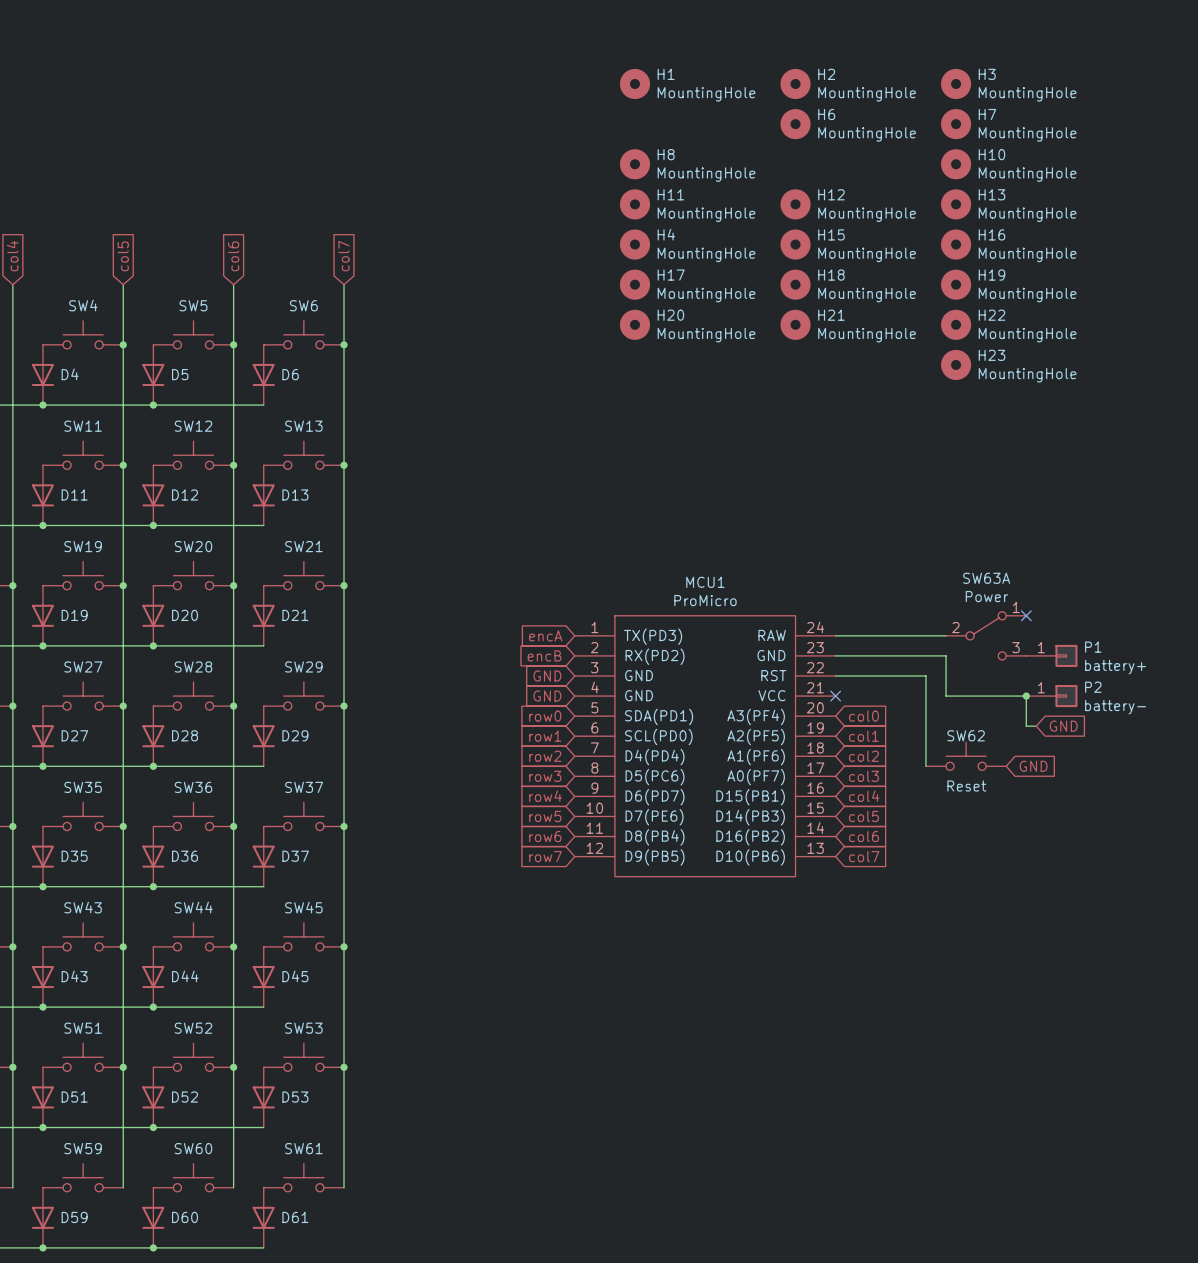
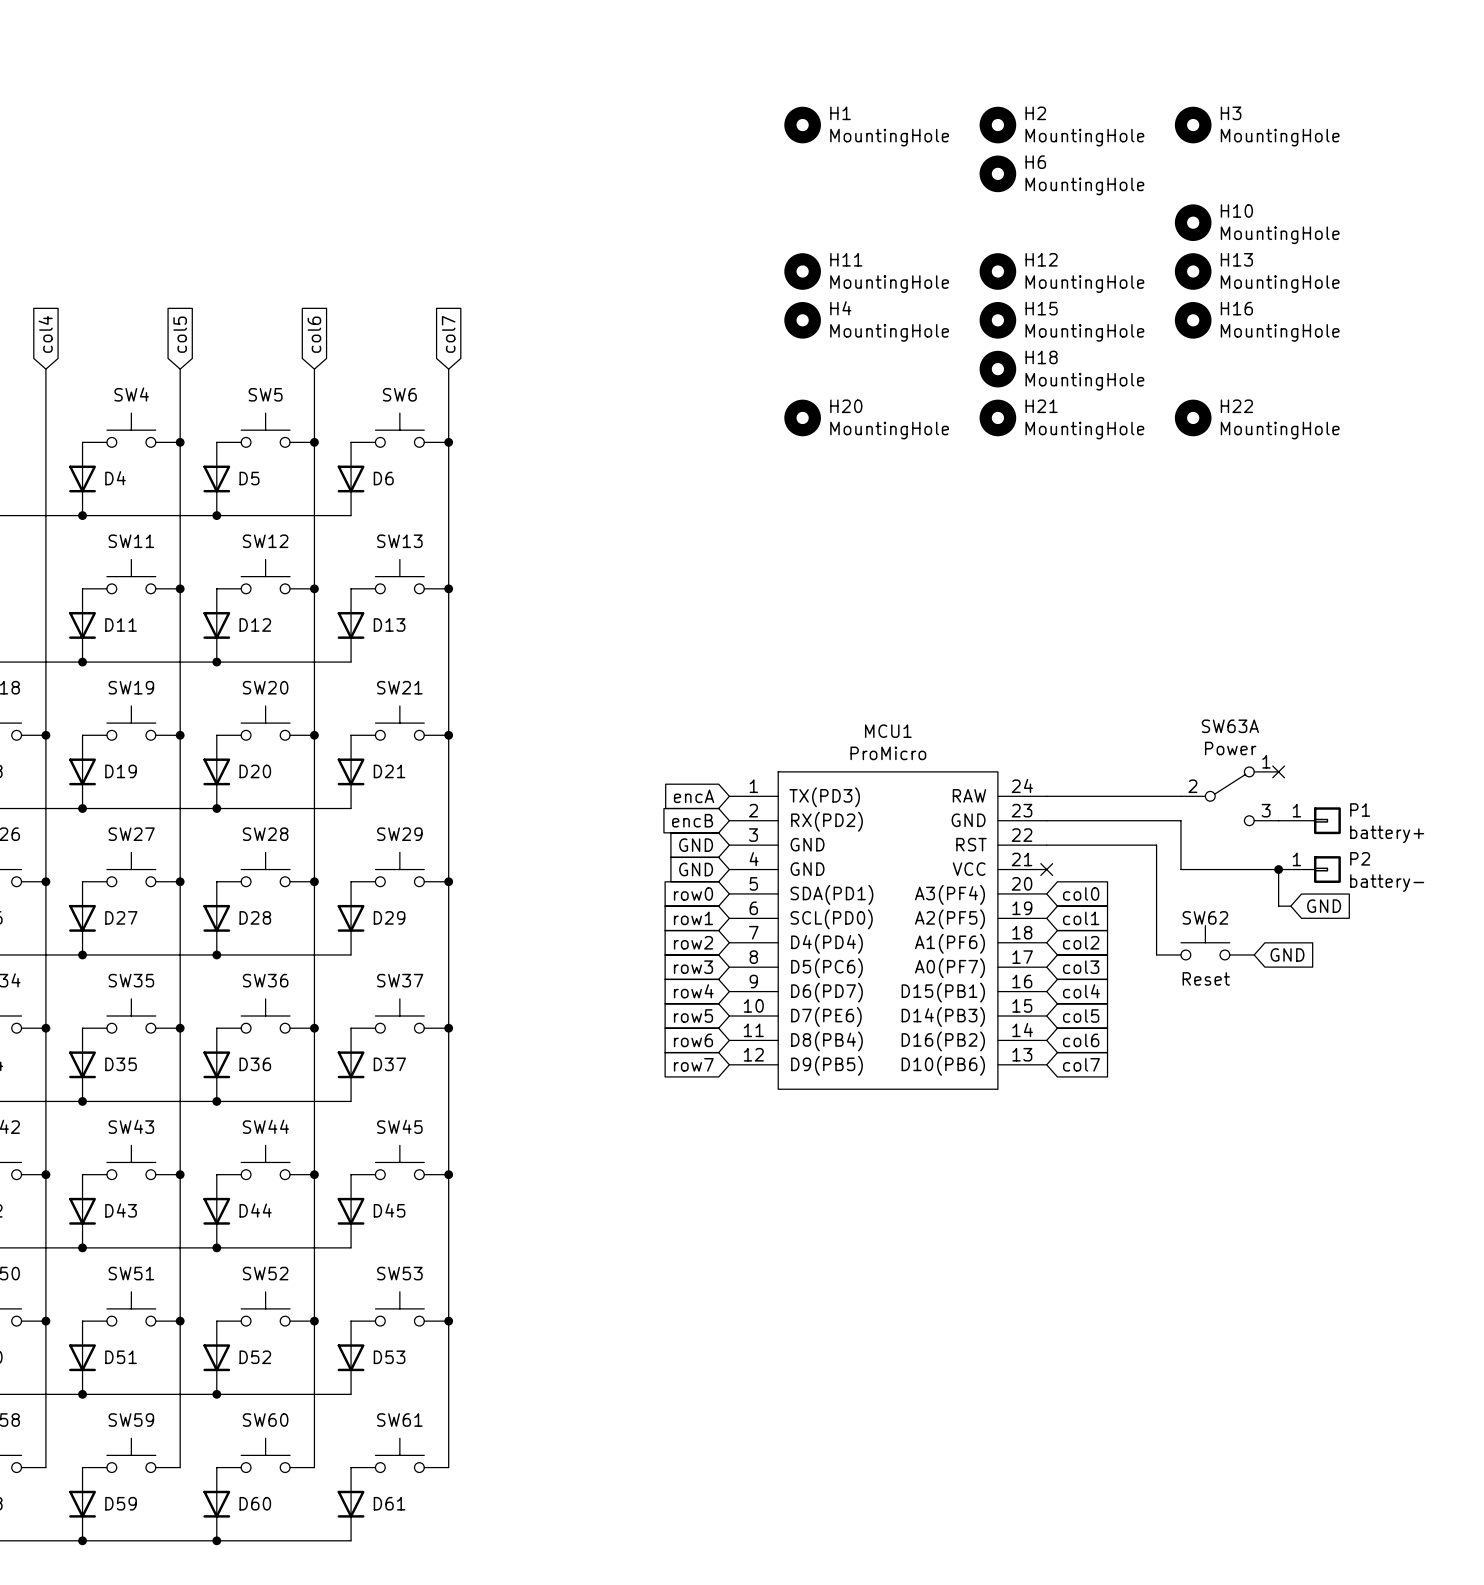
H7: MountingHole (956, 124) -> none
H8: MountingHole (634, 164) -> none
H17: MountingHole (634, 284) -> none
H19: MountingHole (956, 284) -> none
H23: MountingHole (956, 364) -> none

